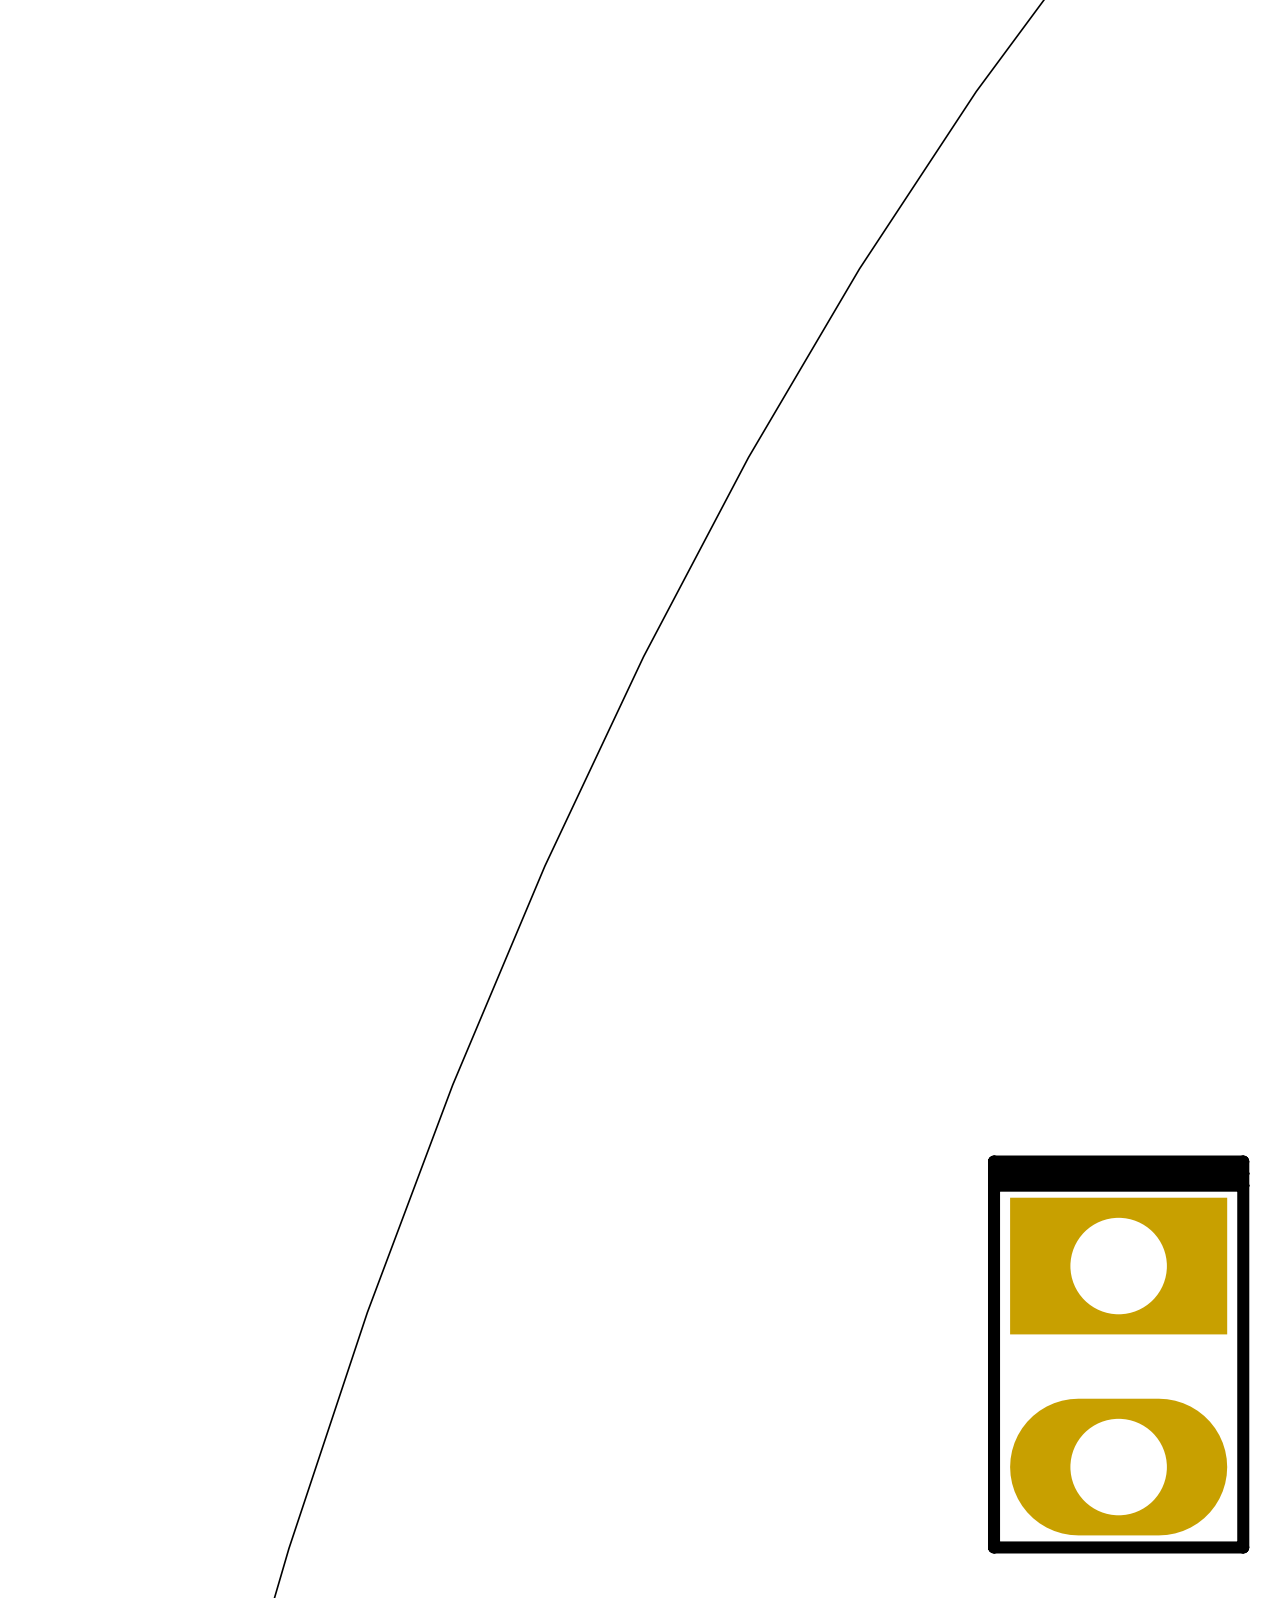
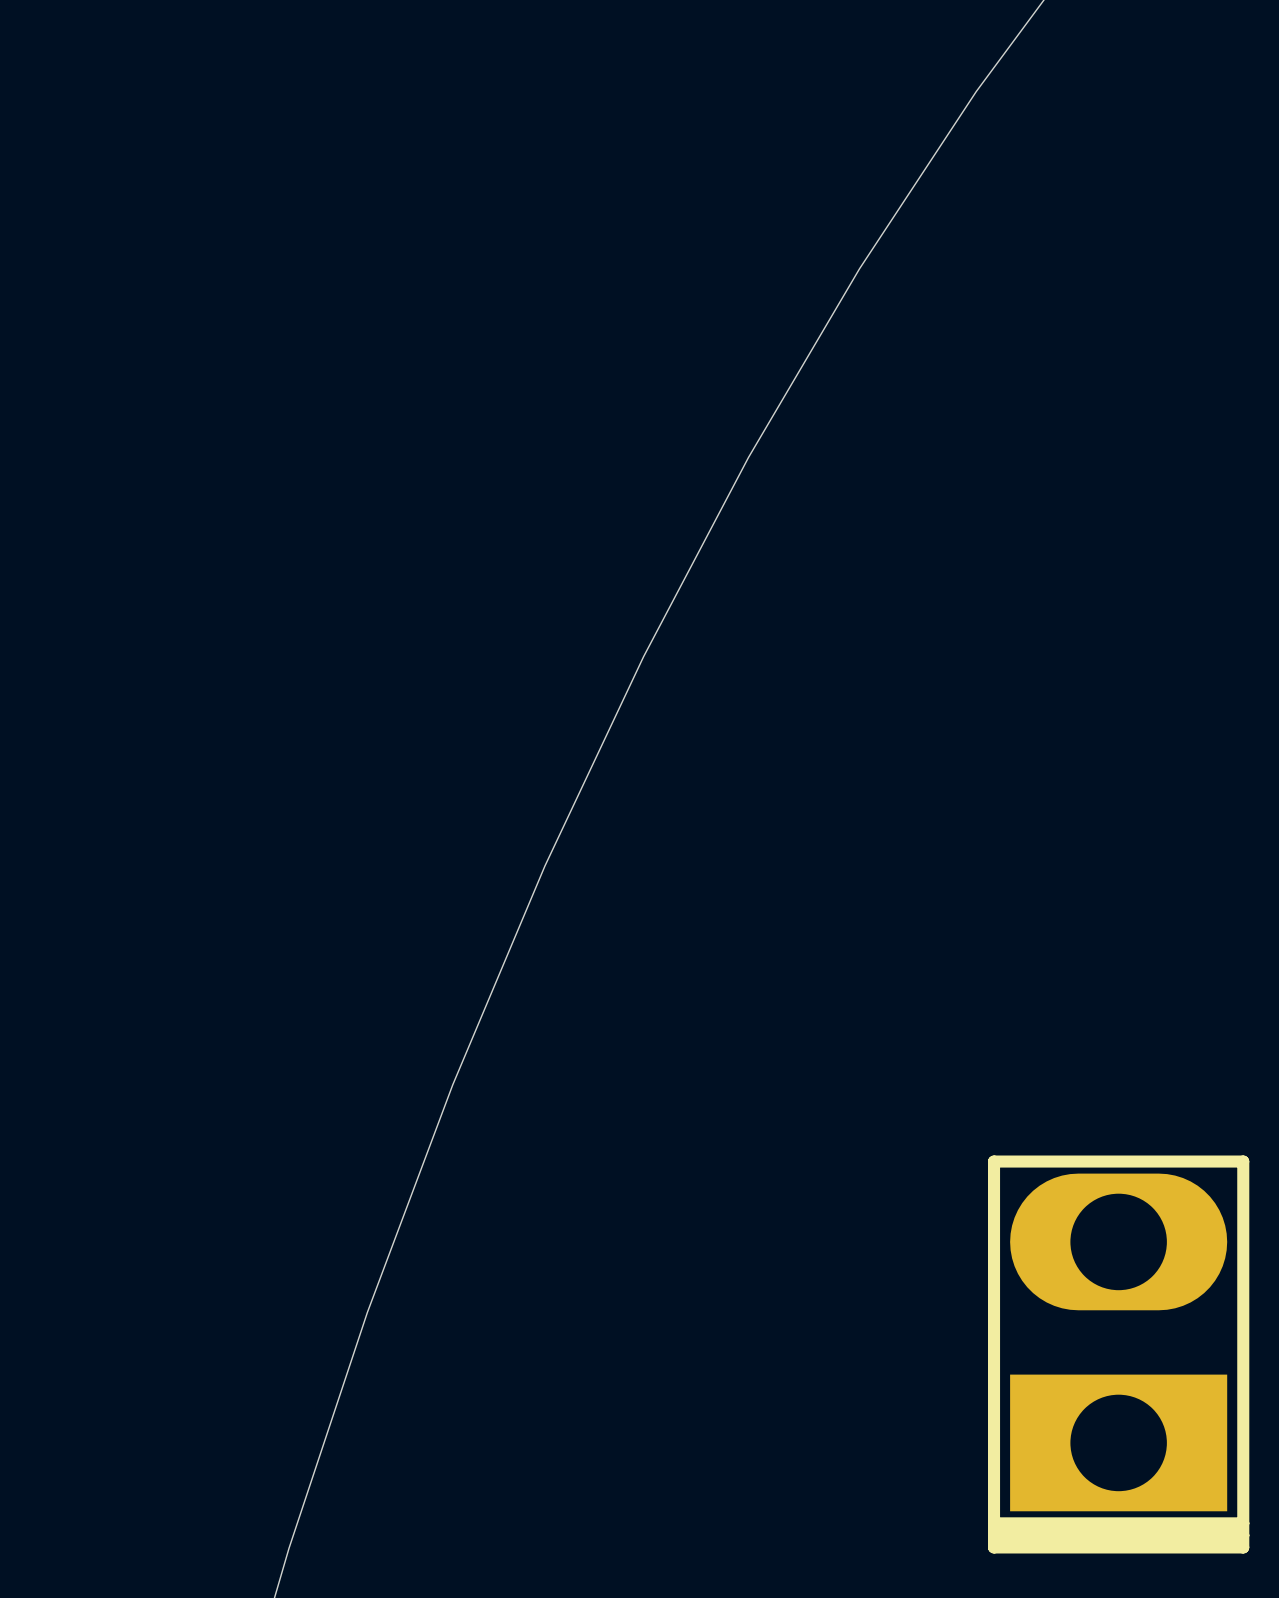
part rotation: 0° (1118, 1354) -> 180° (1118, 1354)

